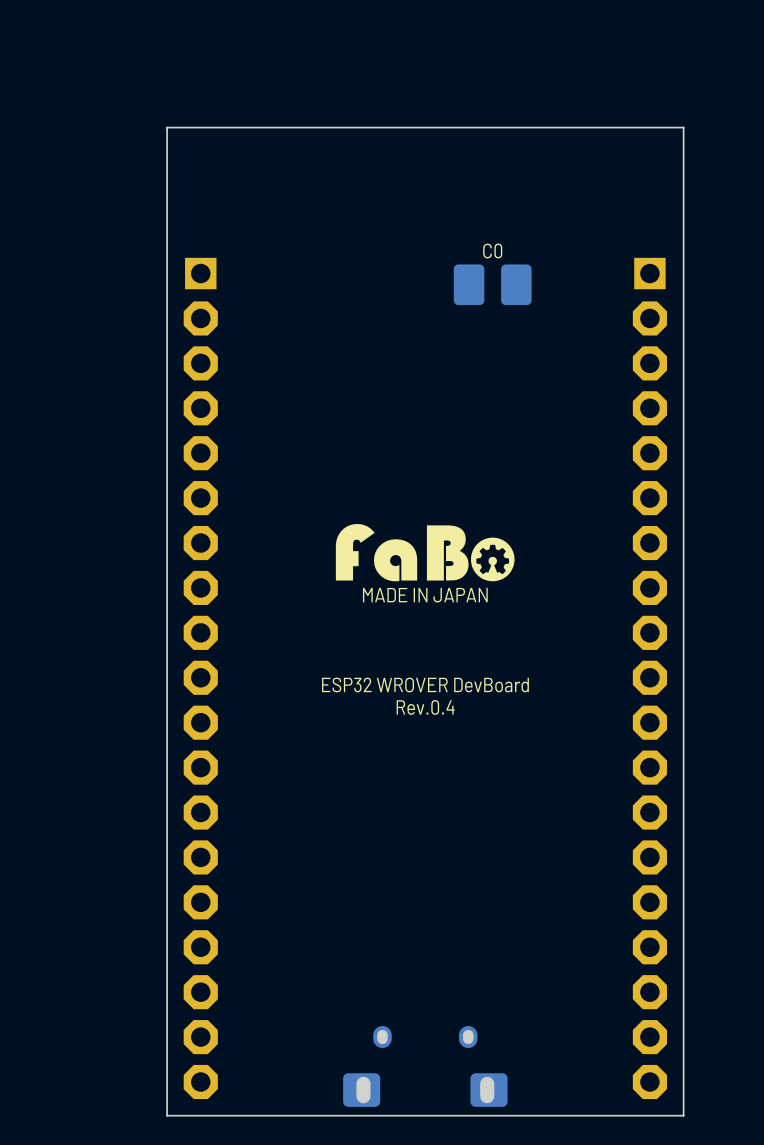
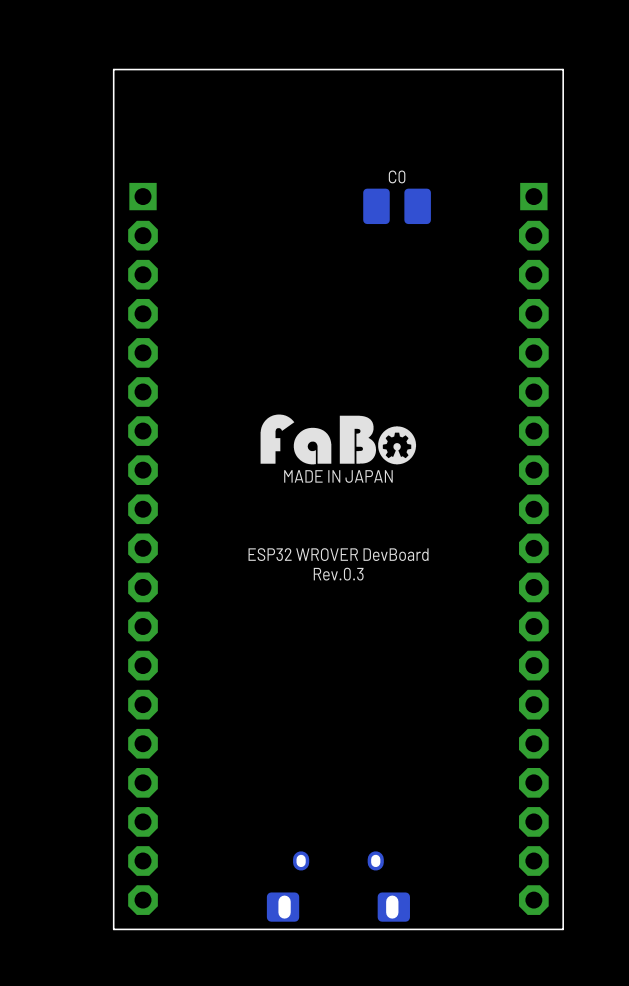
text: Rev.0.4 (425, 707) -> Rev.0.3 (338, 574)

